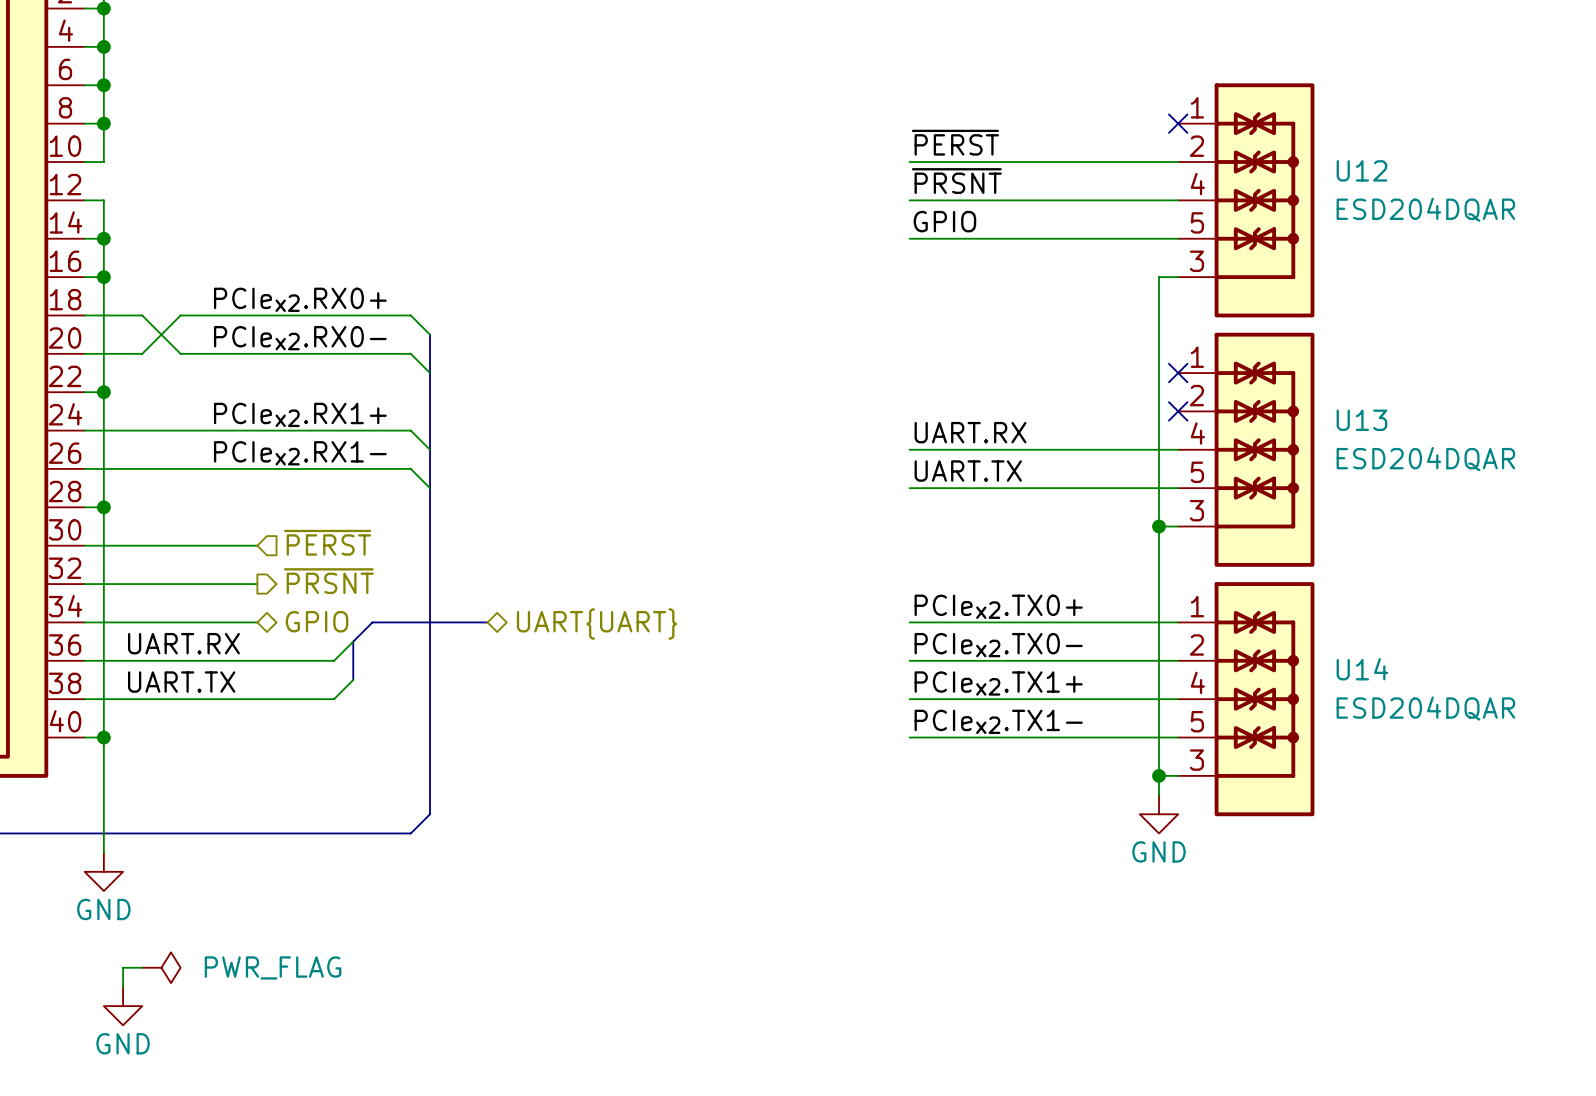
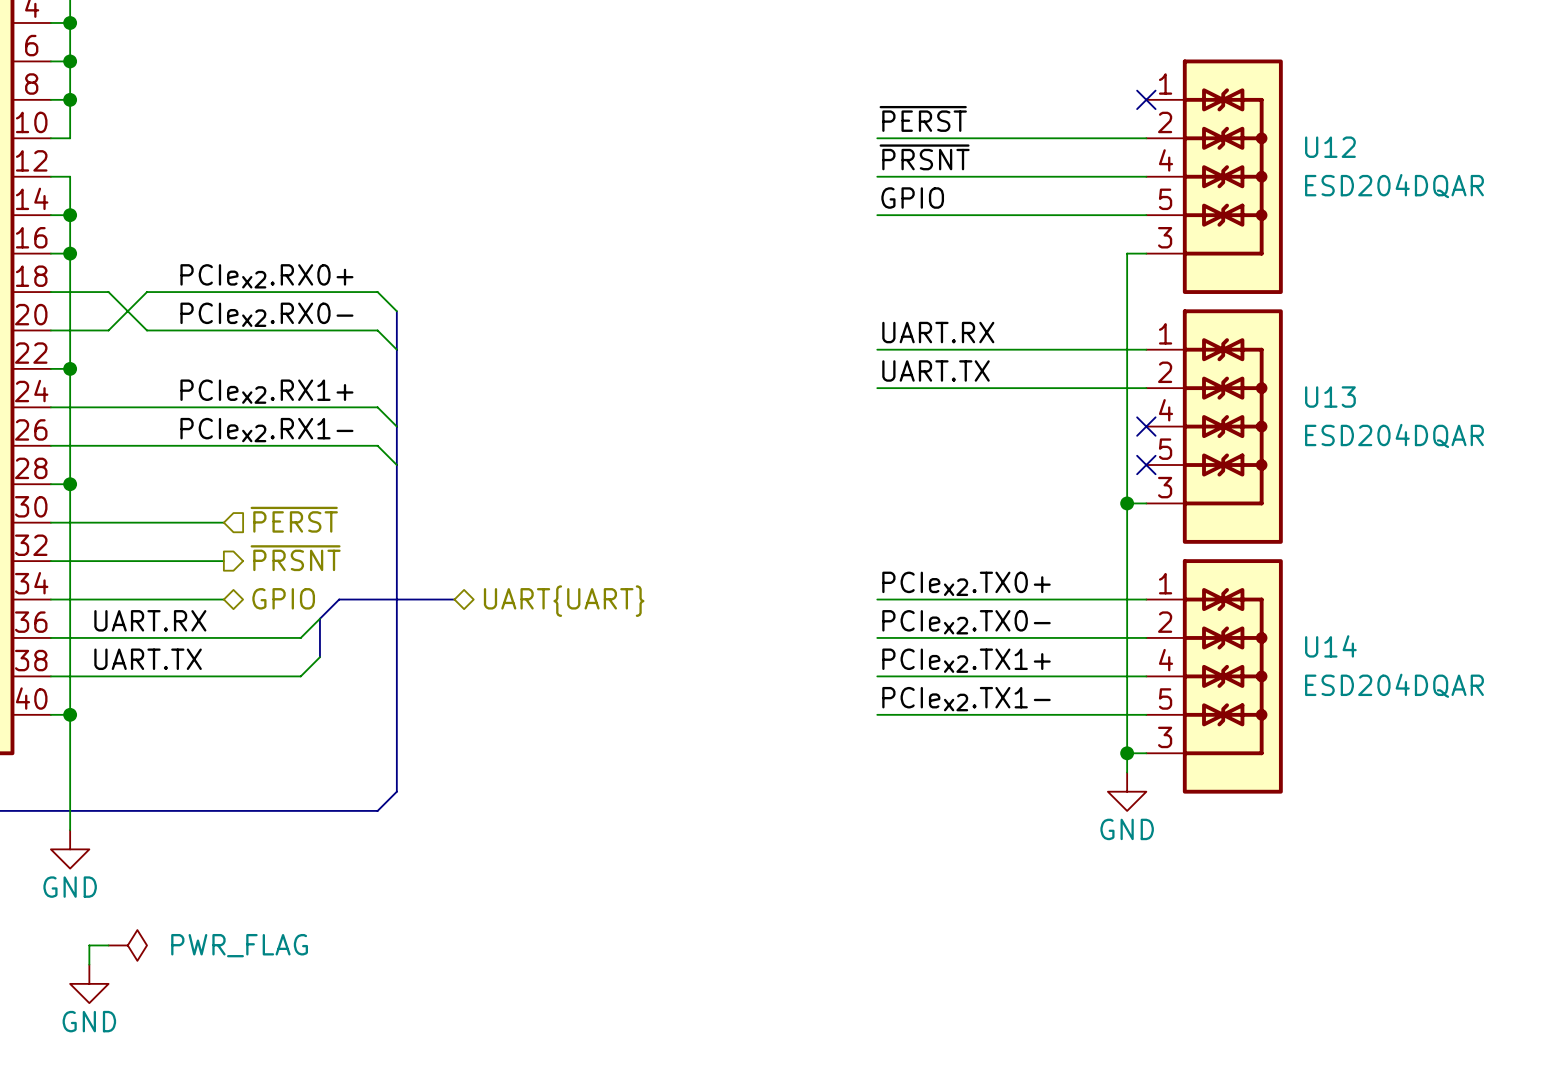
no-connect mark: (1178, 373) -> none
no-connect mark: (1178, 411) -> none
label position: UART.RX (970, 432) -> UART.RX (938, 332)
wire: (909, 449) (1178, 449) -> (877, 388) (1146, 388)
no-connect mark: none -> (1146, 426)
label position: UART.TX (968, 471) -> UART.TX (936, 370)
wire: (909, 488) (1178, 488) -> (877, 349) (1146, 349)
no-connect mark: none -> (1146, 465)

